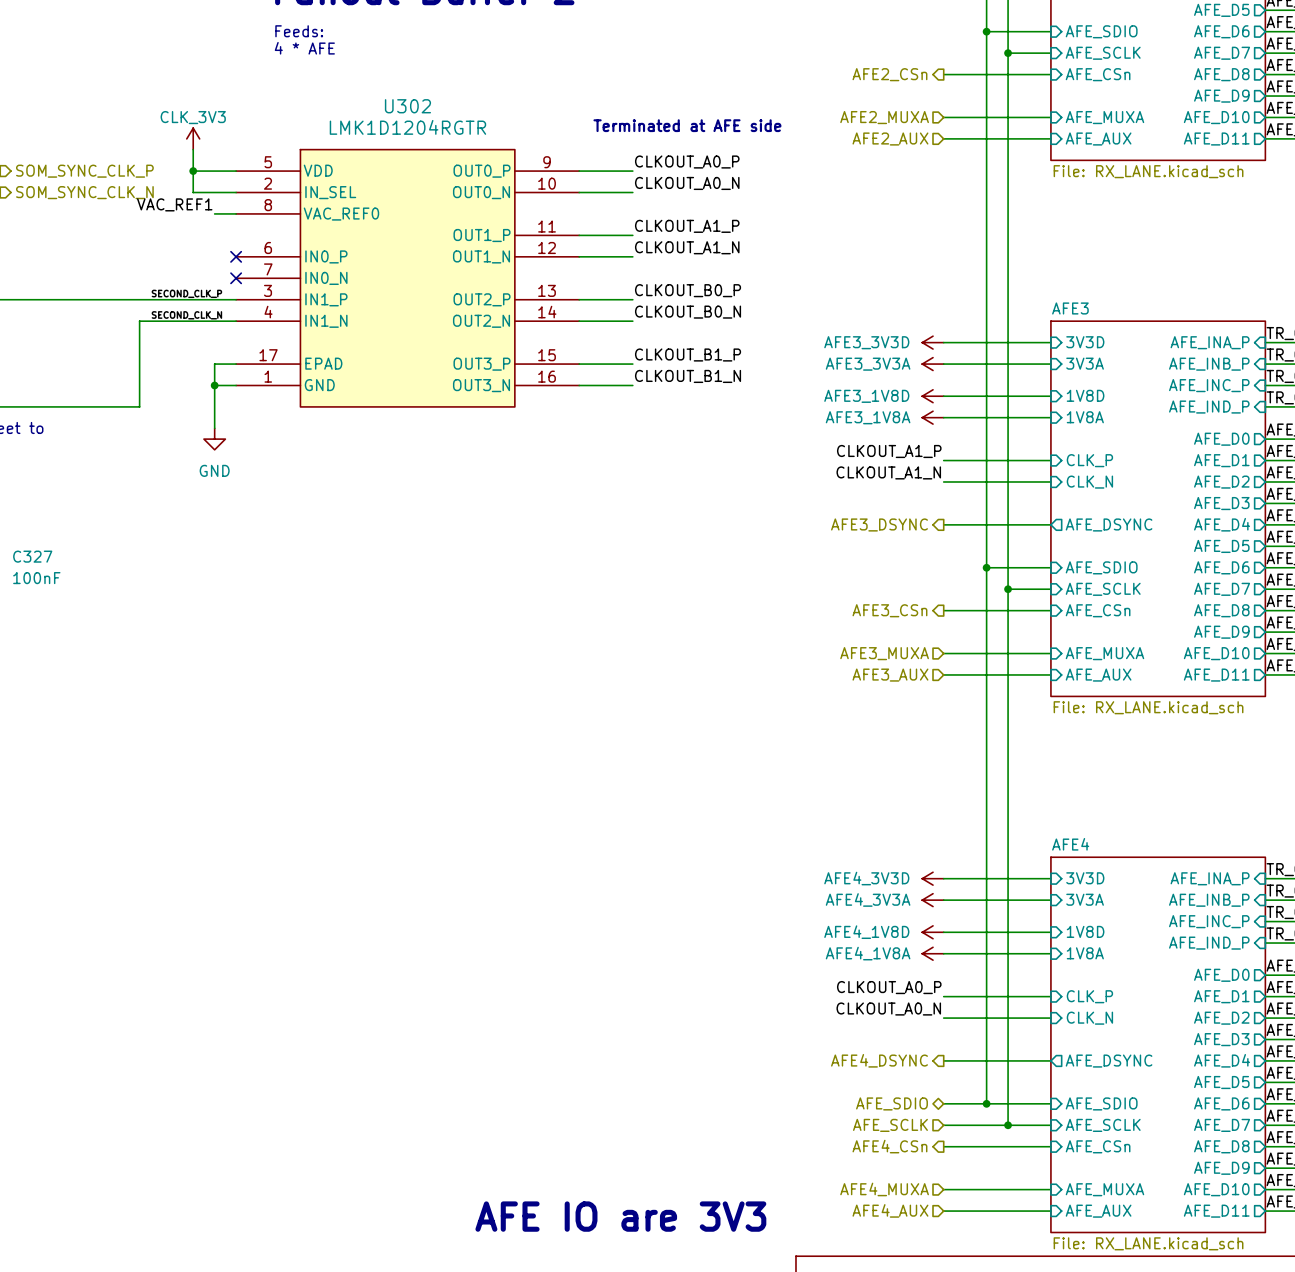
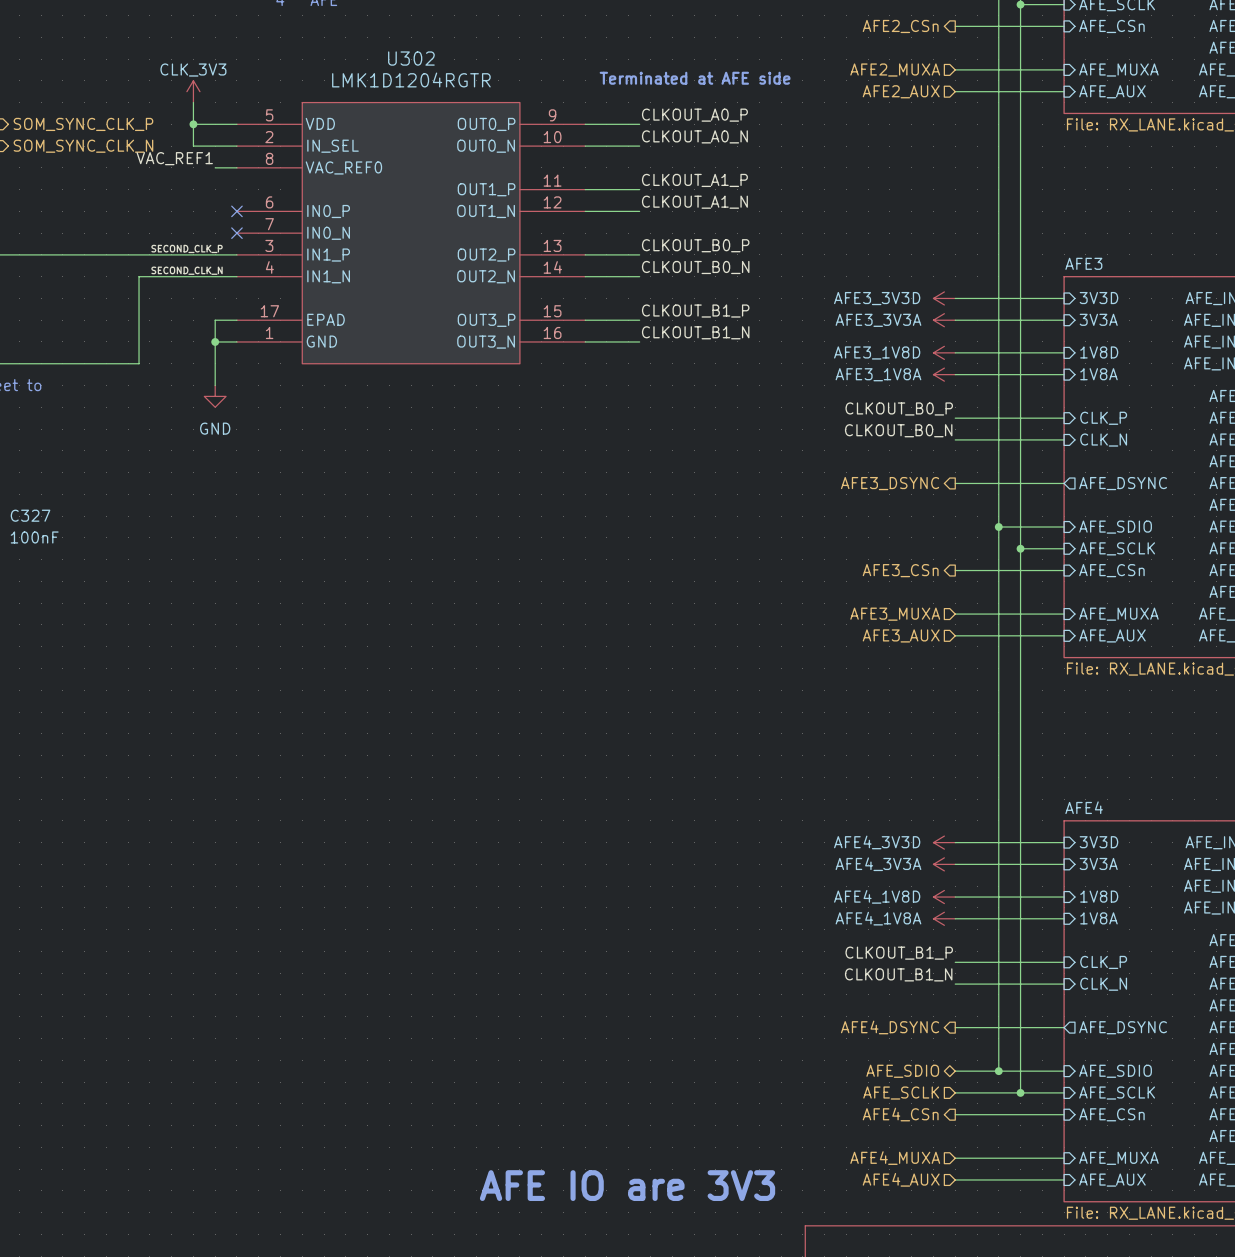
label: CLKOUT_A1_P (889, 451) -> CLKOUT_B0_P (899, 408)
label: CLKOUT_A1_N (888, 472) -> CLKOUT_B0_N (898, 430)
label: CLKOUT_A0_P (889, 987) -> CLKOUT_B1_P (899, 953)
label: CLKOUT_A0_N (888, 1009) -> CLKOUT_B1_N (898, 974)

